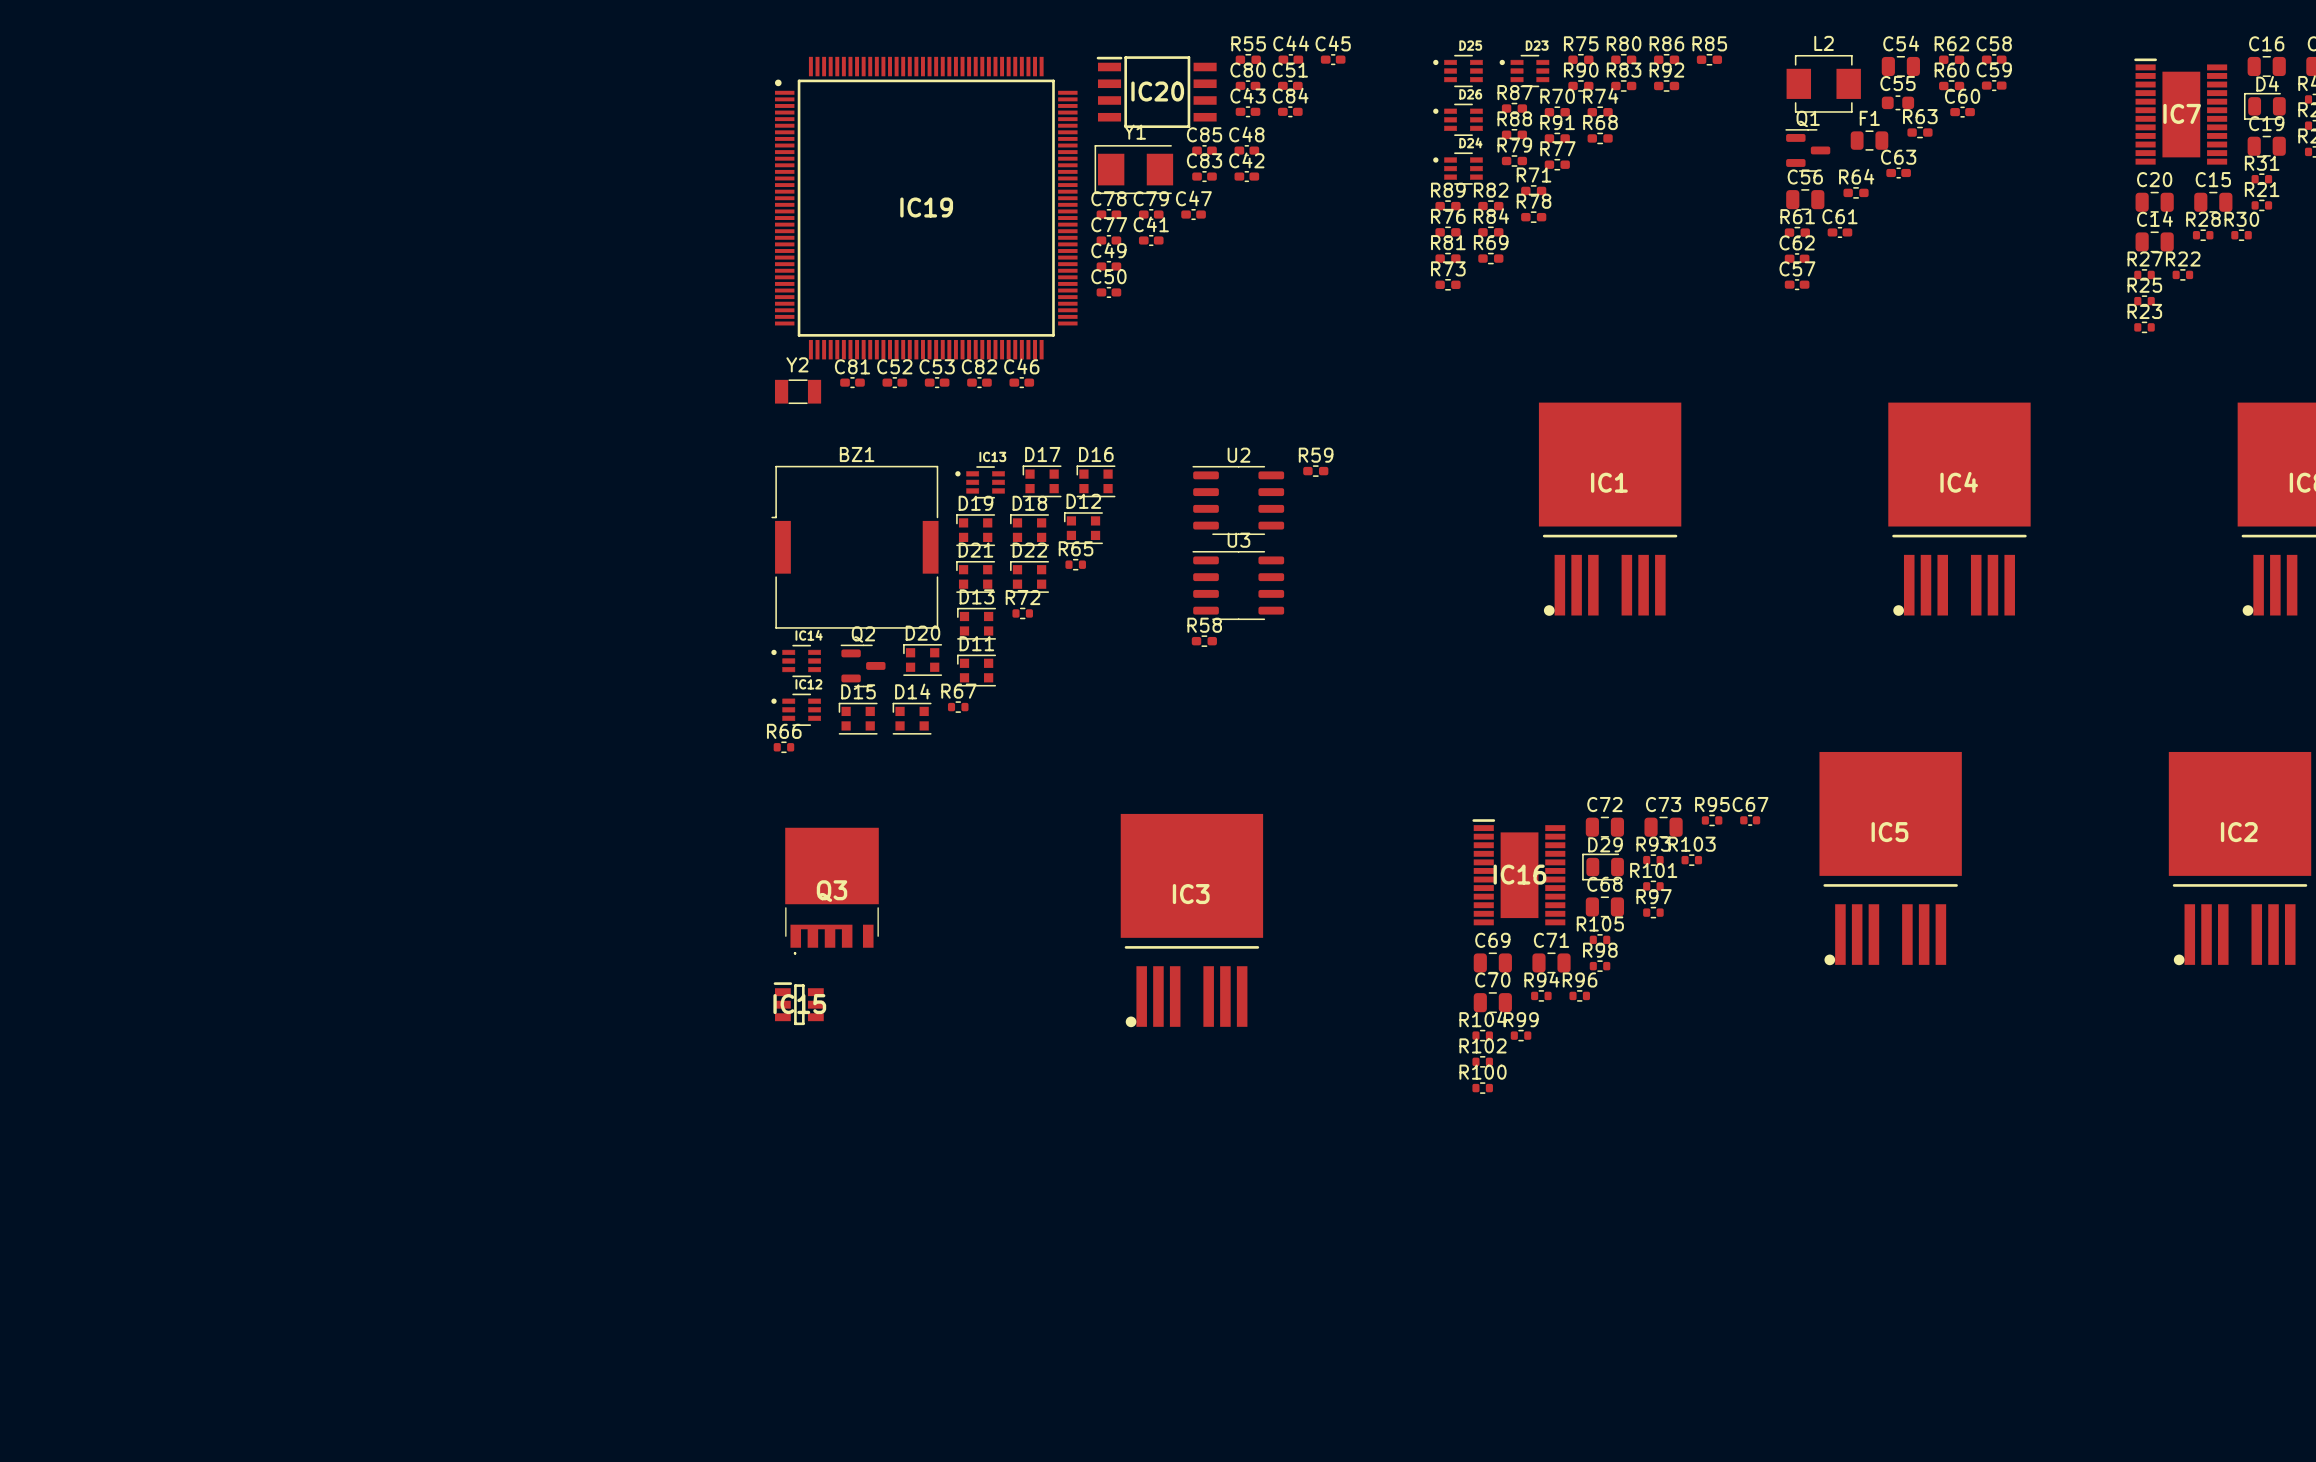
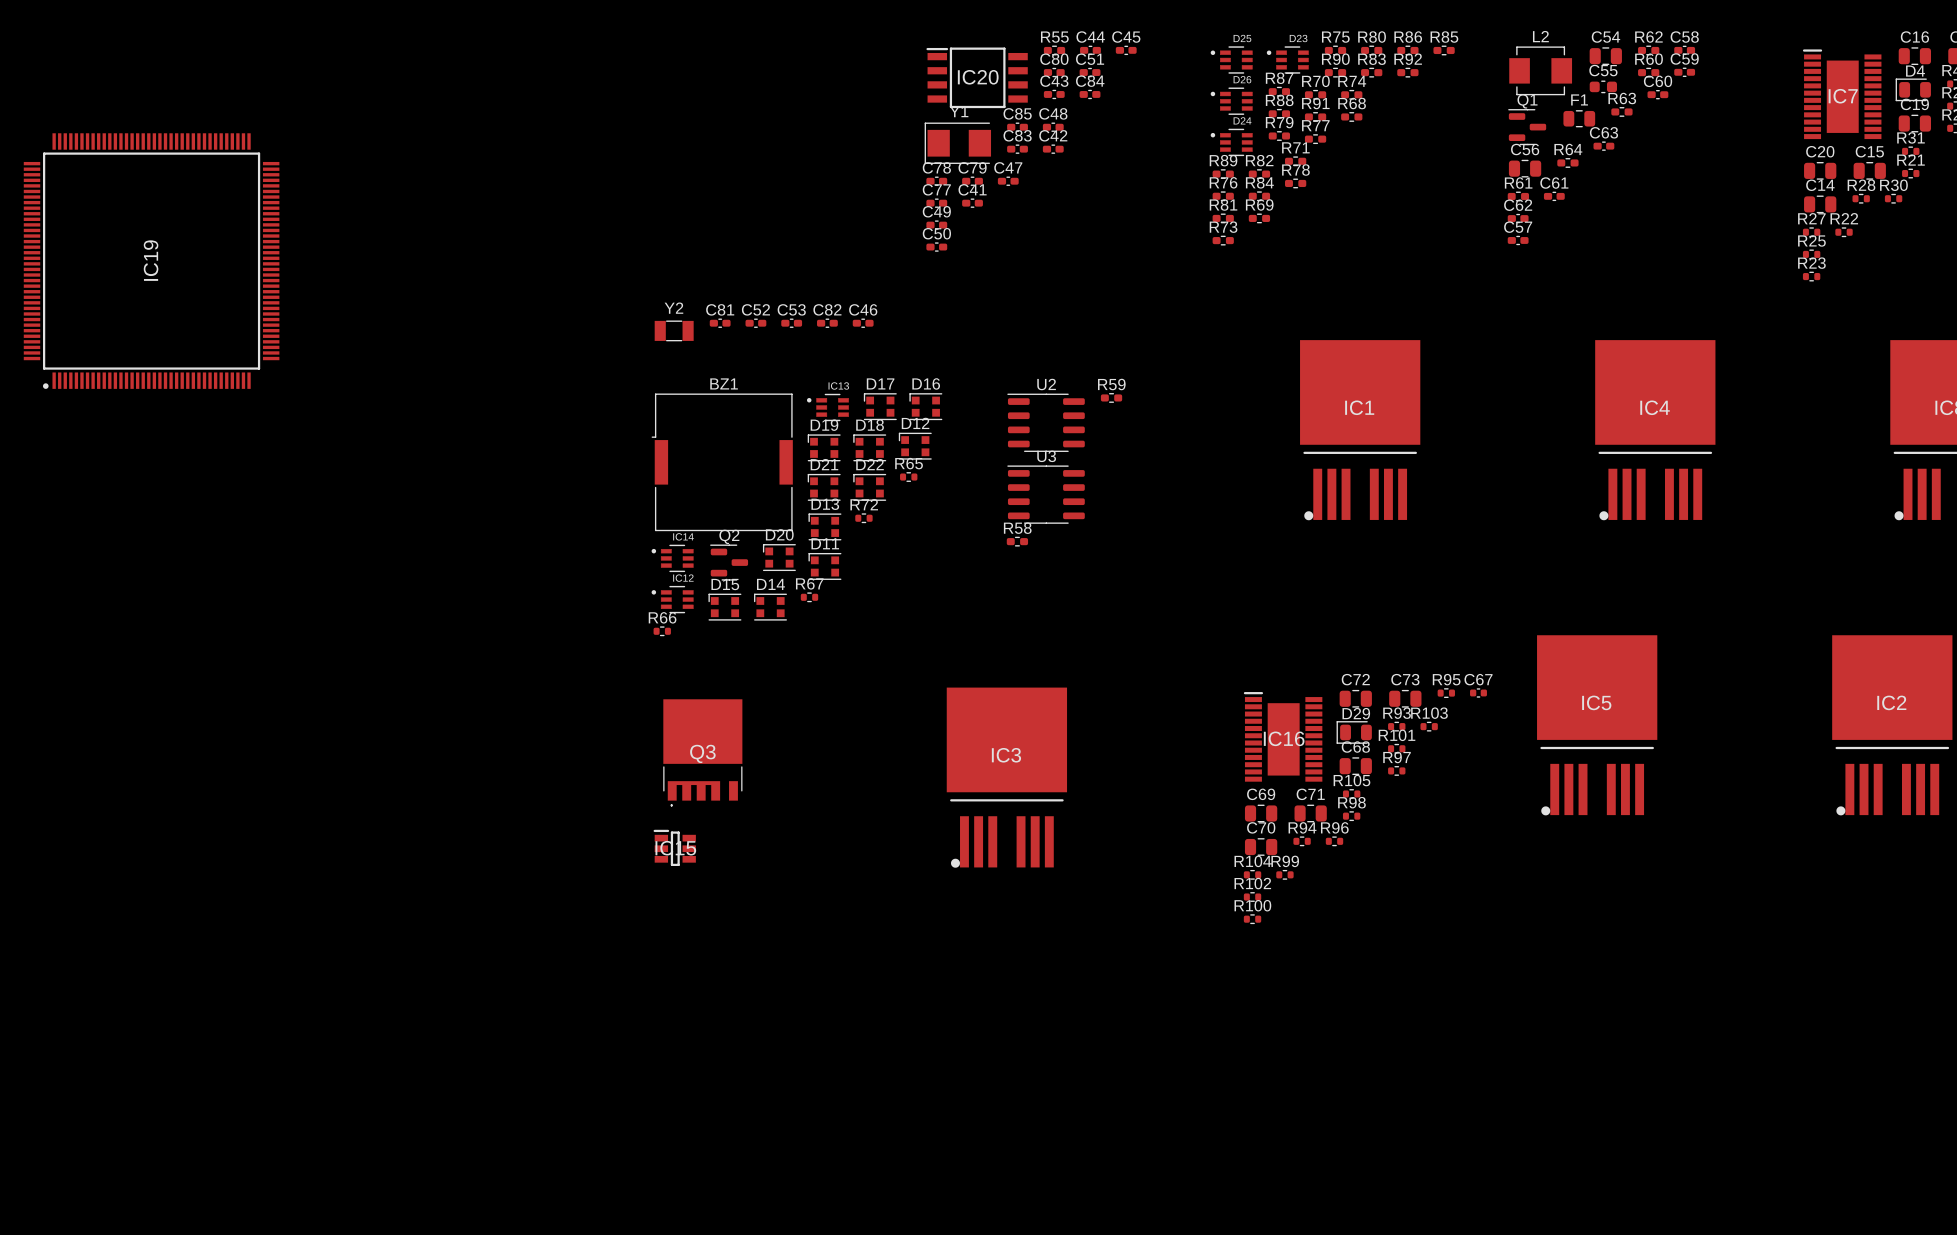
IC19 rotation: 0° (926, 208) -> 90° counterclockwise (151, 261)
IC19 position: (926, 208) -> (151, 261)

